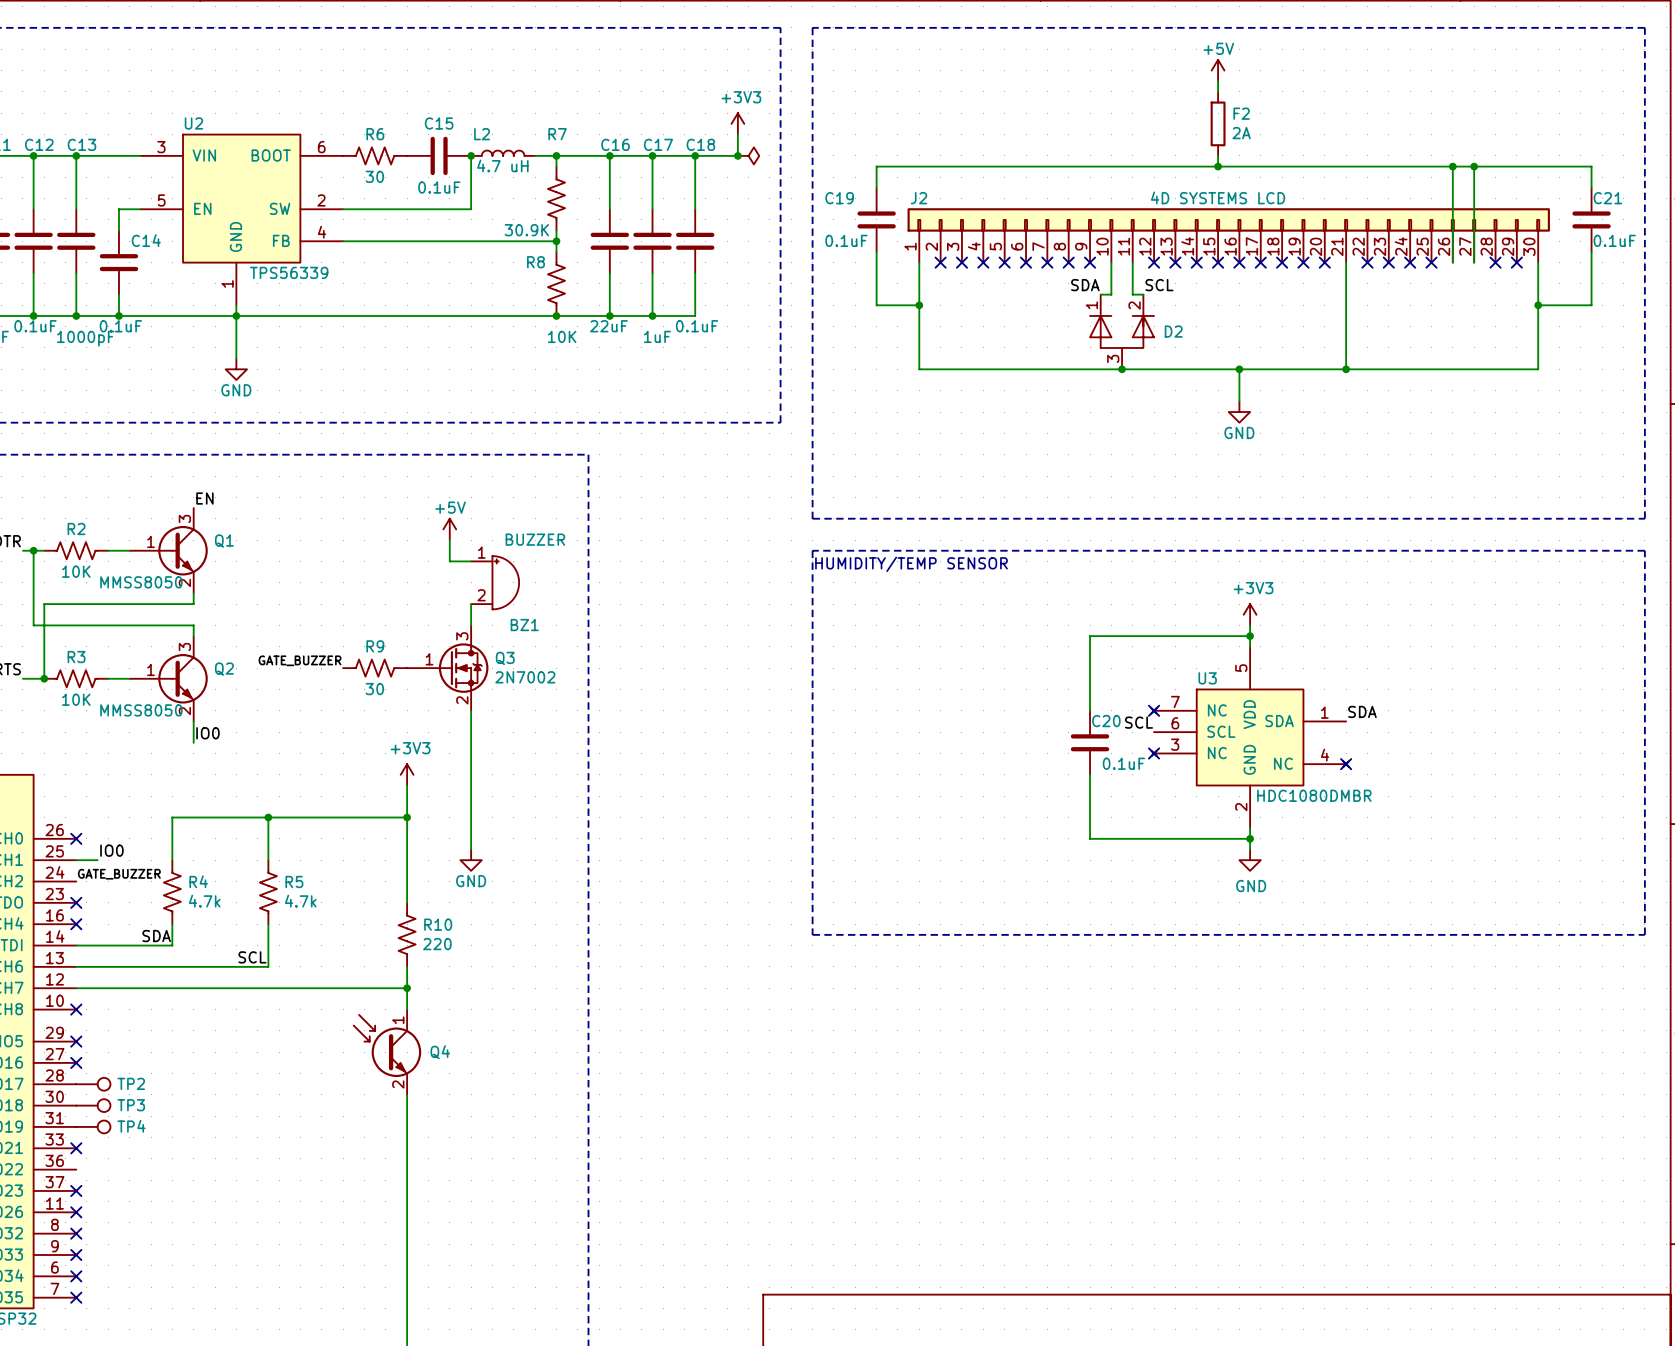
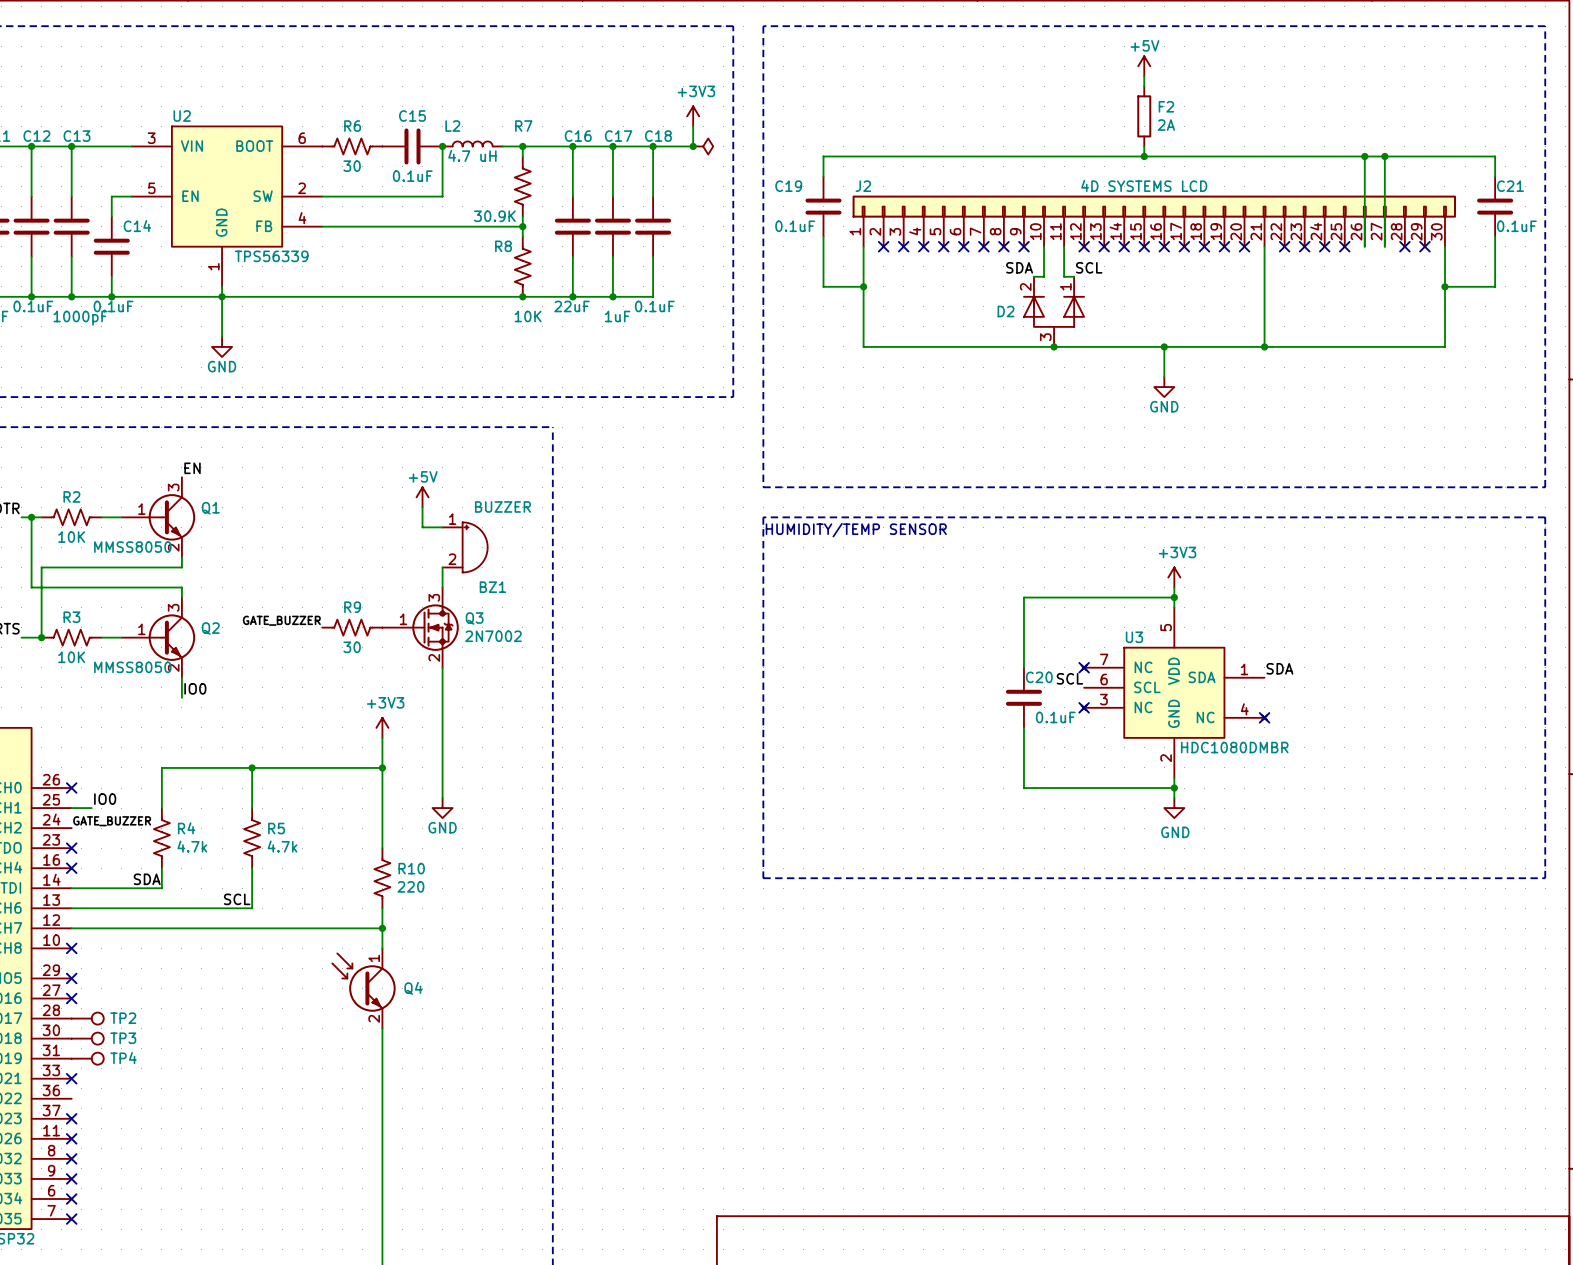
D2 flip: as is (1122, 331) -> left-right (1054, 311)

